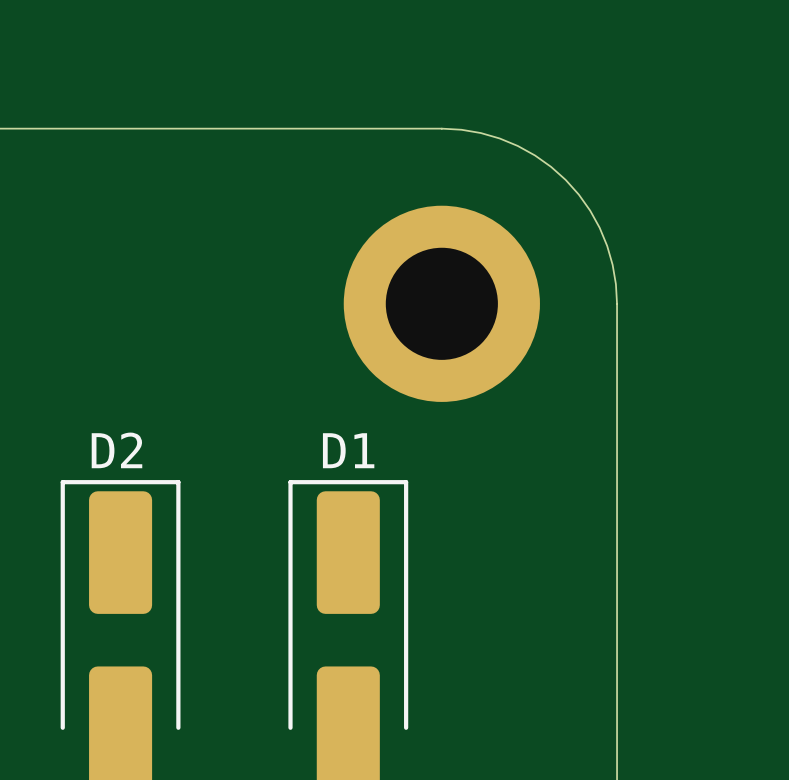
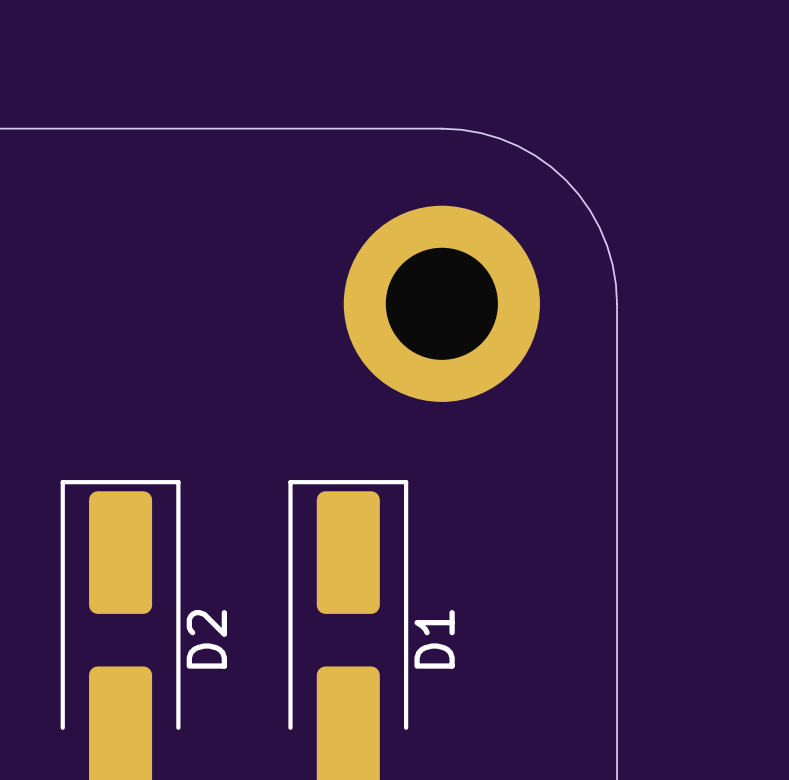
D2 name rotation: 0° (116, 450) -> 90° counterclockwise (206, 639)
D2 name position: D2 (116, 450) -> D2 (206, 639)
D1 name rotation: 0° (348, 450) -> 90° counterclockwise (434, 639)
D1 name position: D1 (348, 450) -> D1 (434, 639)

